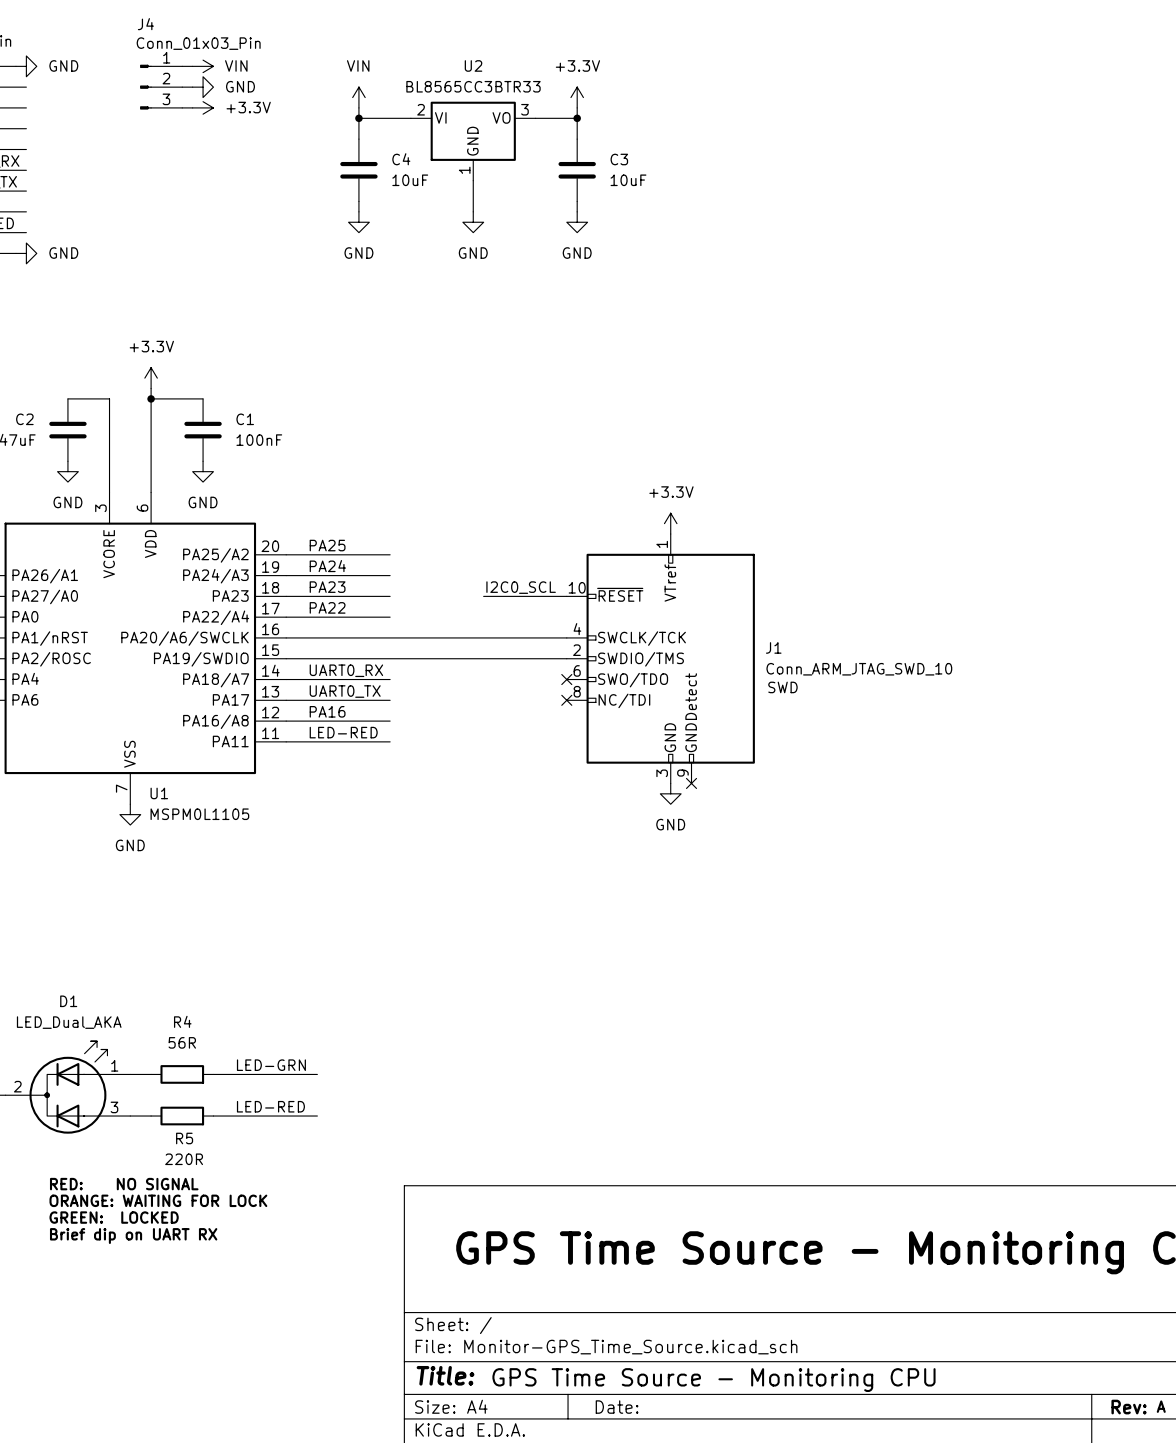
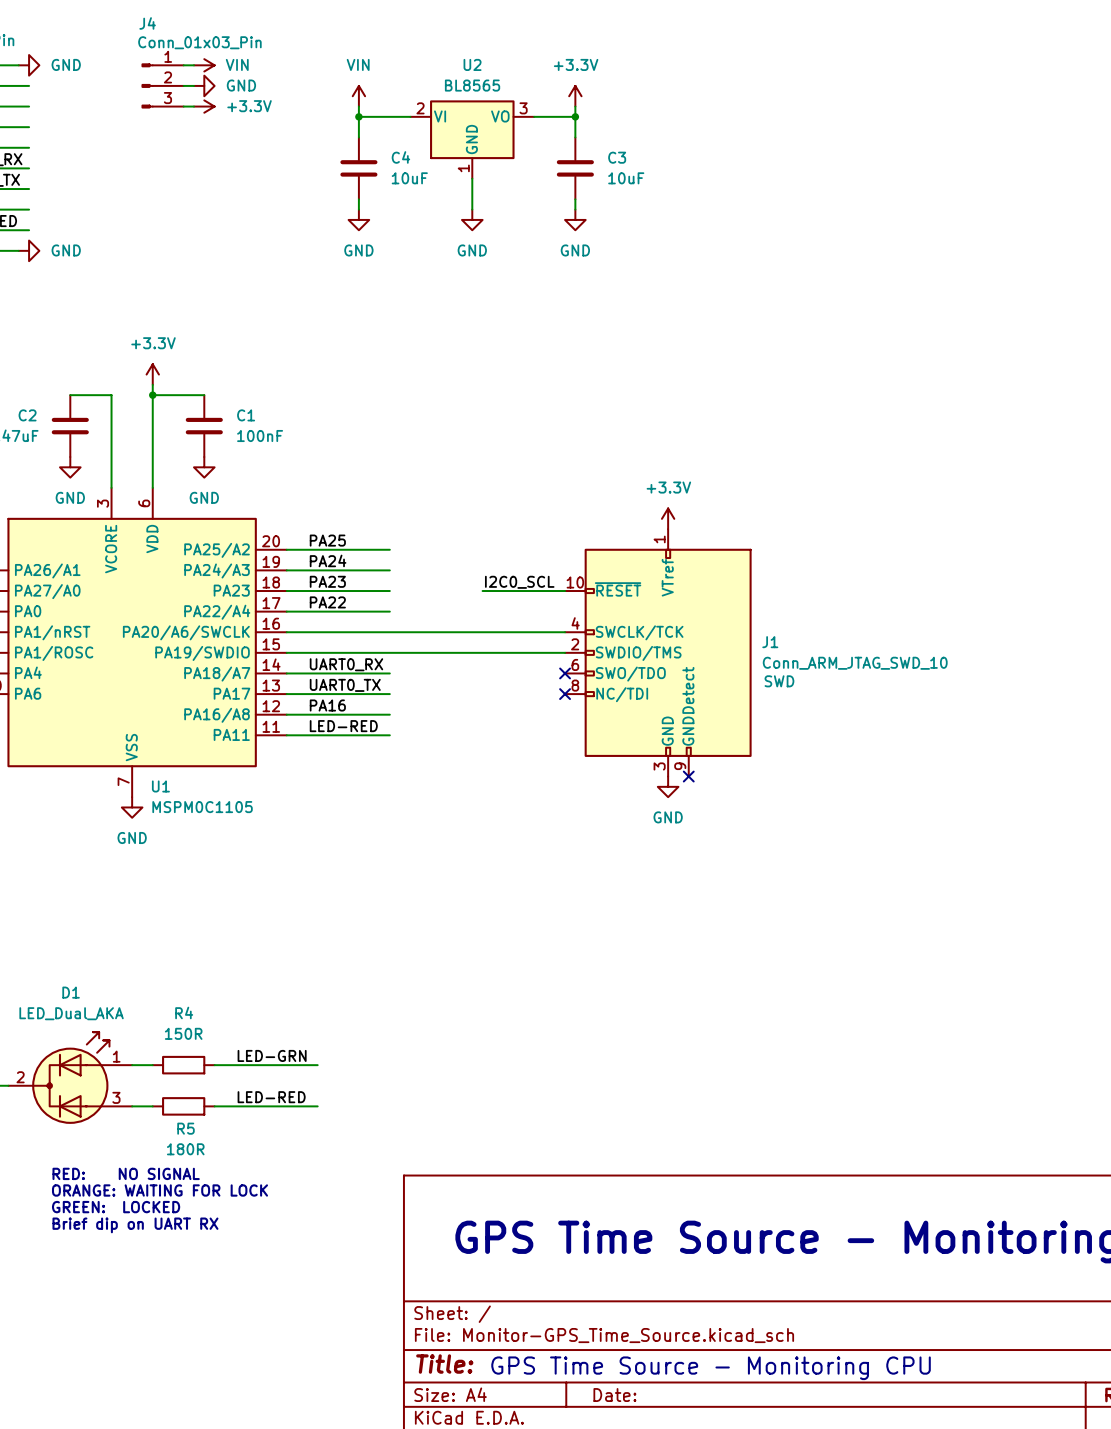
U2 value: BL8565CC3BTR33 (473, 86) -> BL8565 (472, 85)
U1 pin name: PA2/ROSC (51, 659) -> PA1/ROSC (54, 653)
U1 value: MSPM0L1105 (199, 814) -> MSPM0C1105 (202, 807)
R4 value: 56R (182, 1042) -> 150R (183, 1033)
R5 value: 220R (184, 1159) -> 180R (185, 1149)

